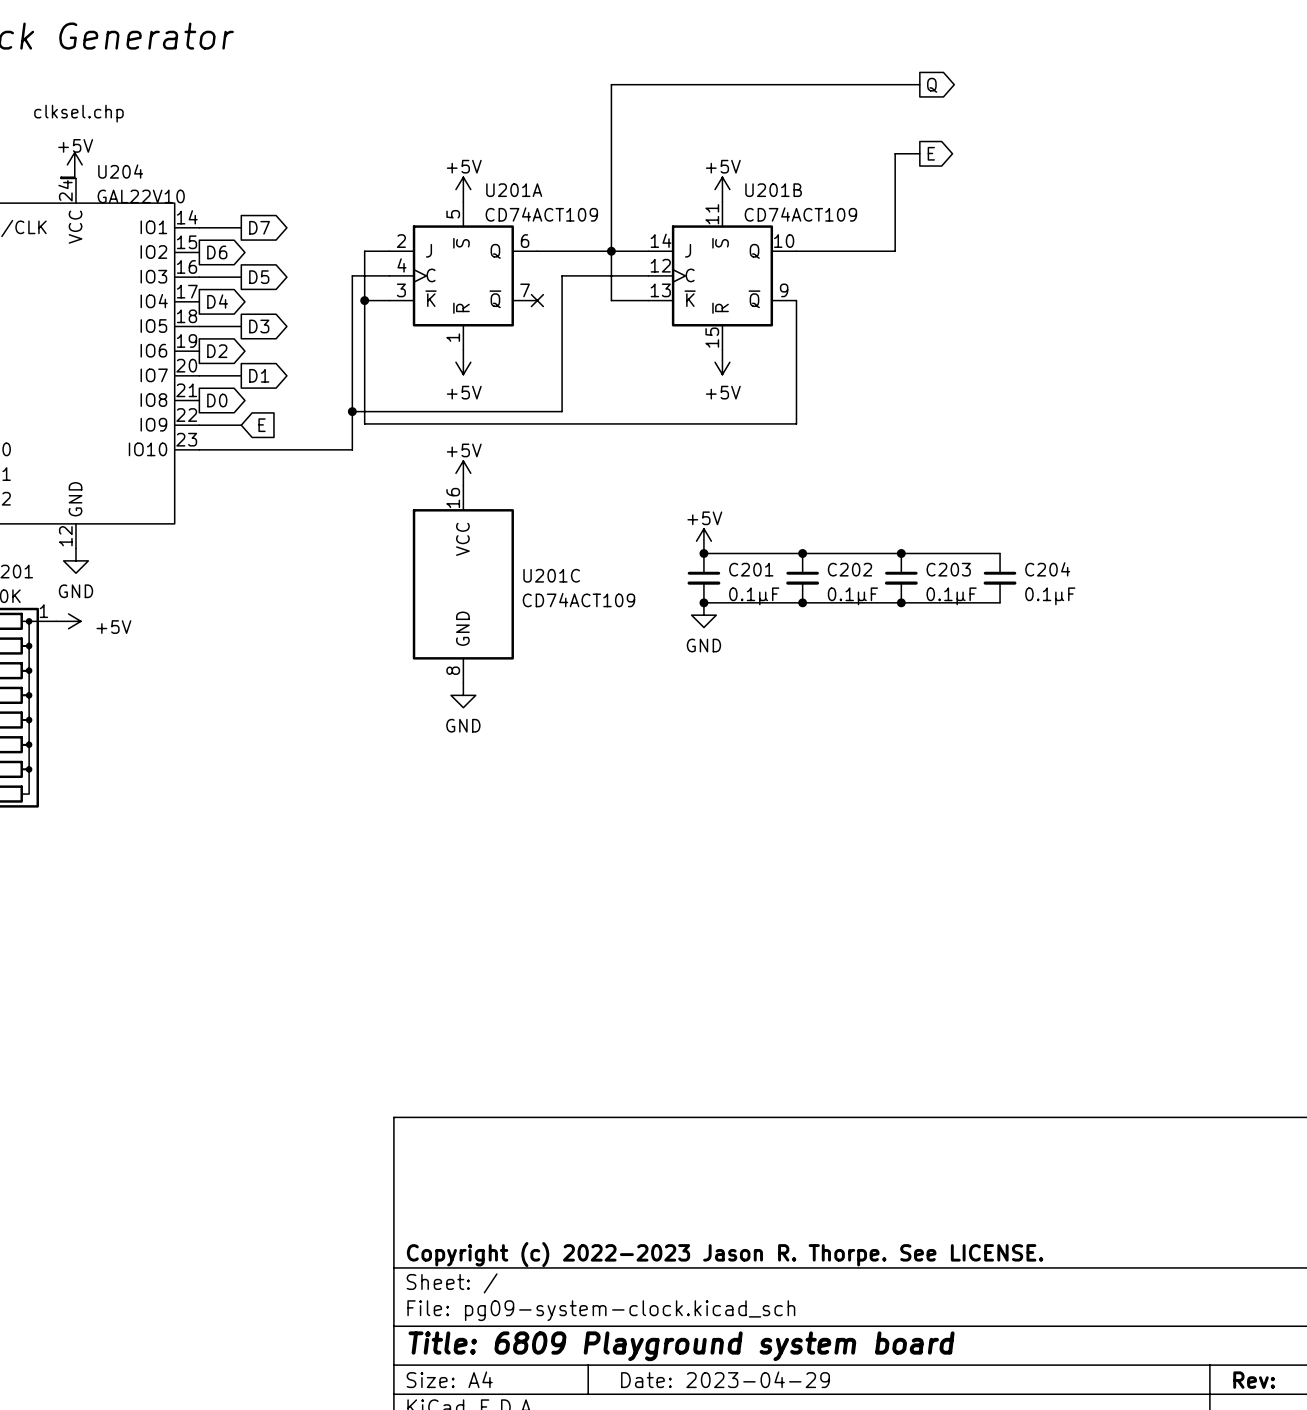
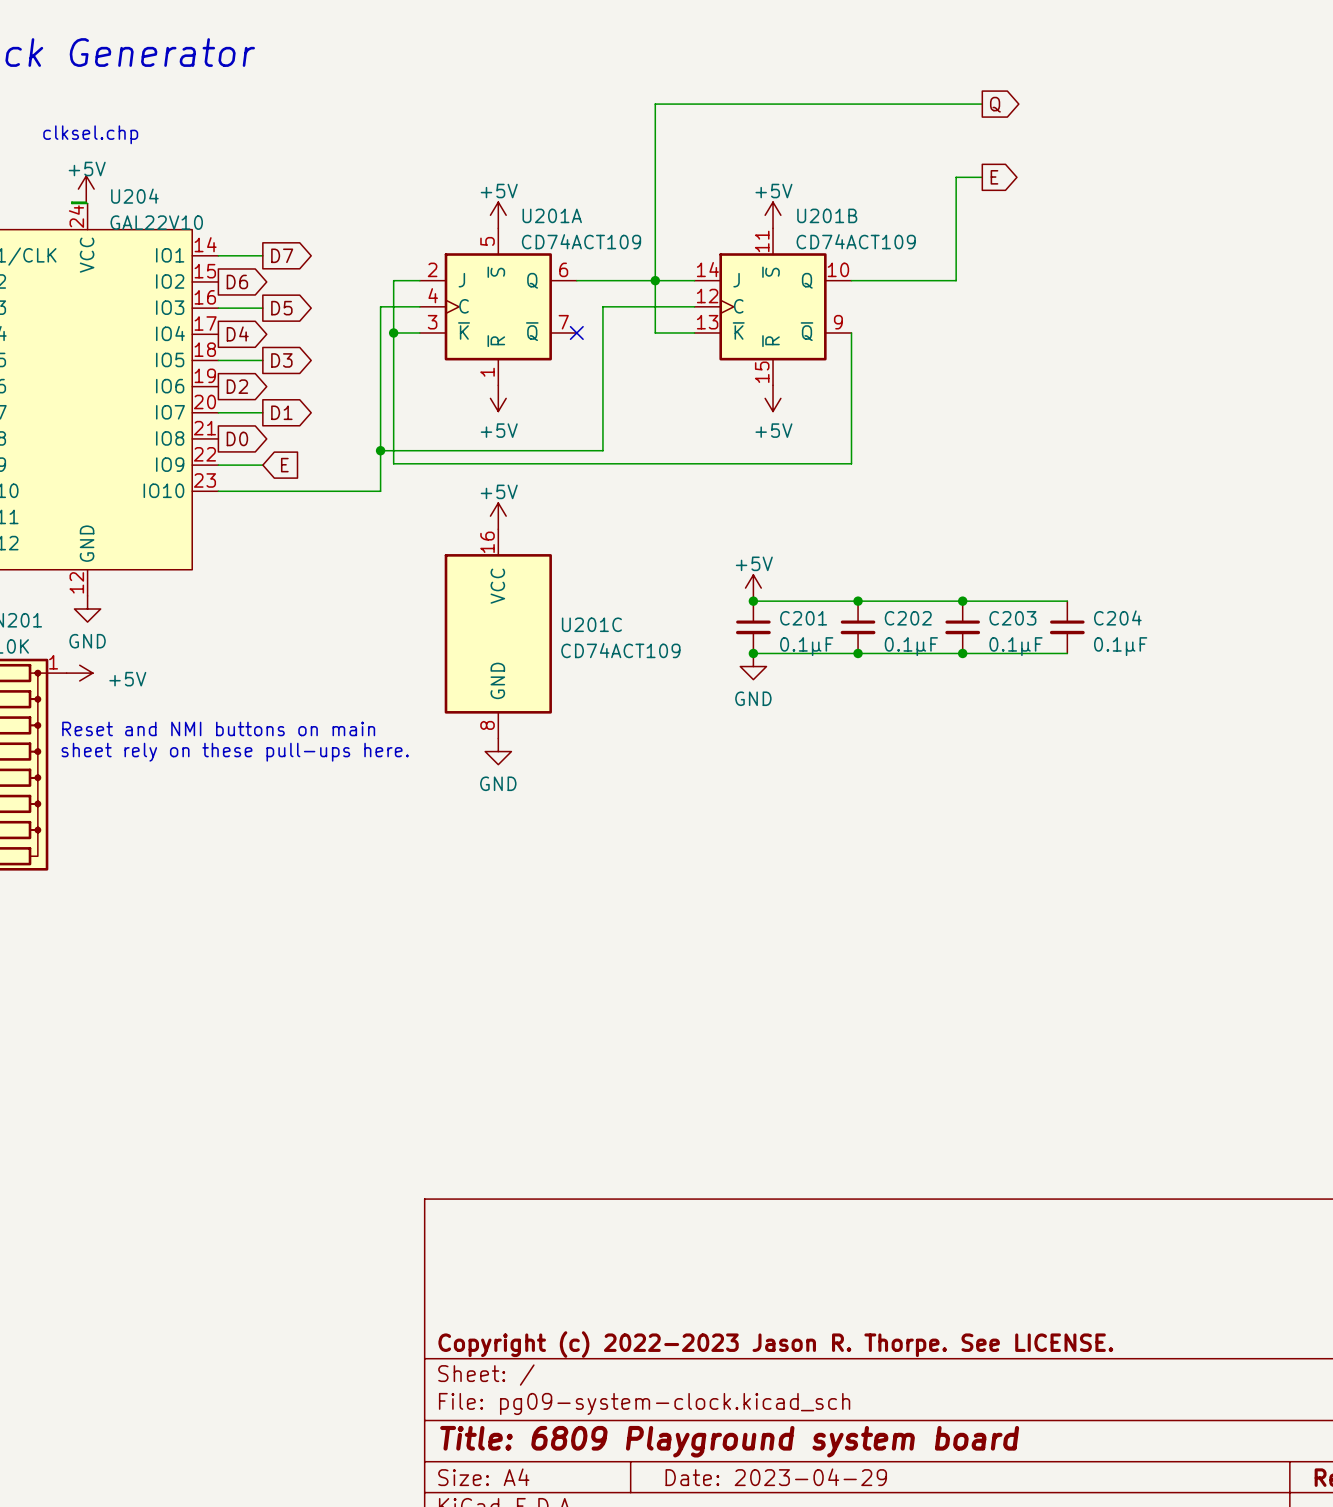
text: none -> Reset and NMI buttons on main (218, 728)
text: none -> sheet rely on these pull-ups here. (235, 752)

